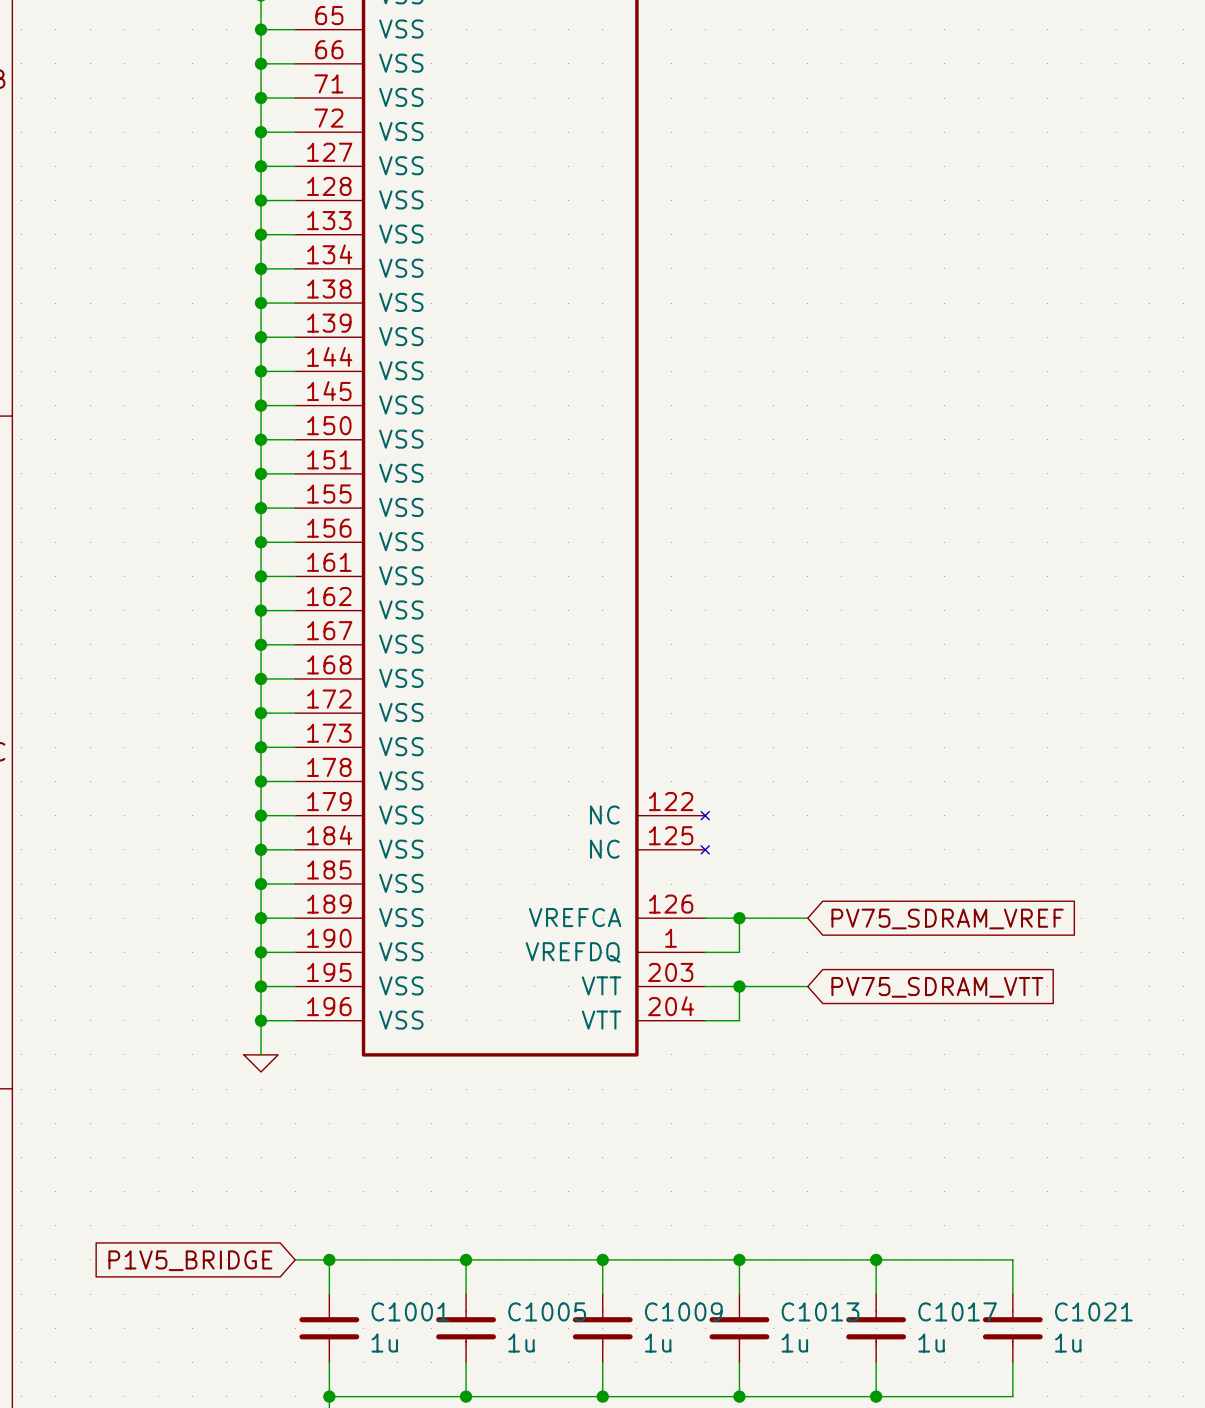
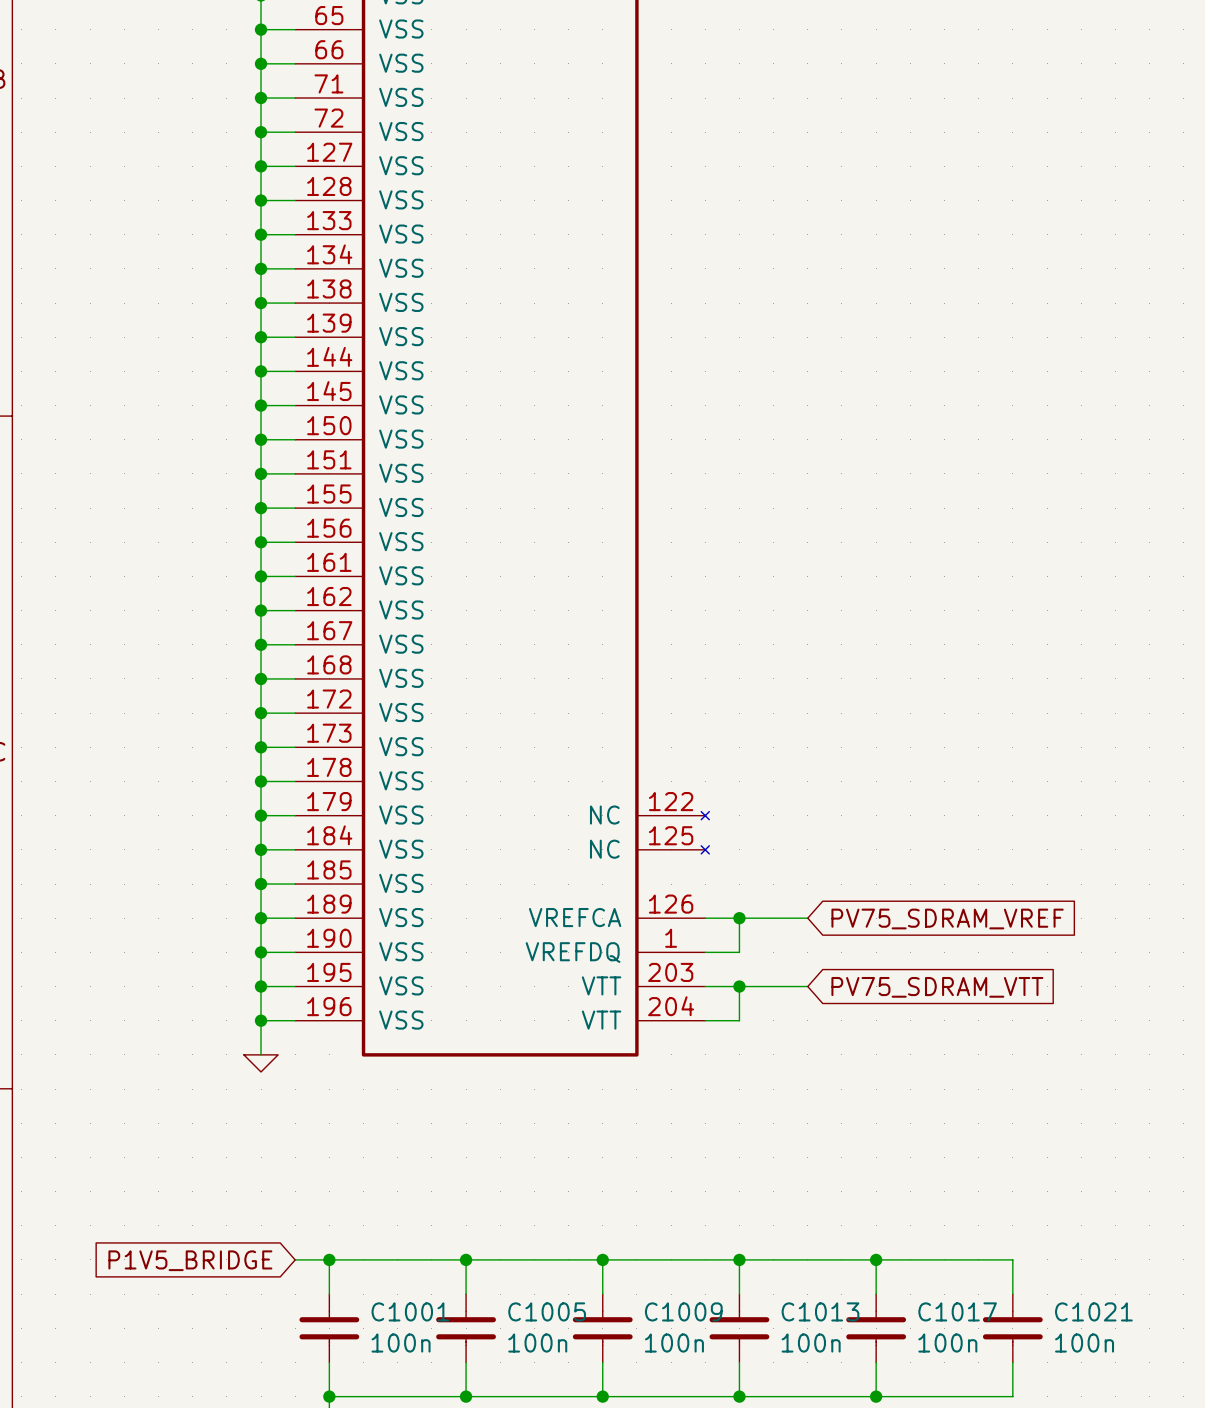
C1001 value: 1u (384, 1343) -> 100n (401, 1343)
C1005 value: 1u (521, 1343) -> 100n (537, 1343)
C1009 value: 1u (658, 1343) -> 100n (674, 1343)
C1013 value: 1u (794, 1343) -> 100n (811, 1343)
C1017 value: 1u (931, 1343) -> 100n (947, 1343)
C1021 value: 1u (1068, 1343) -> 100n (1084, 1343)

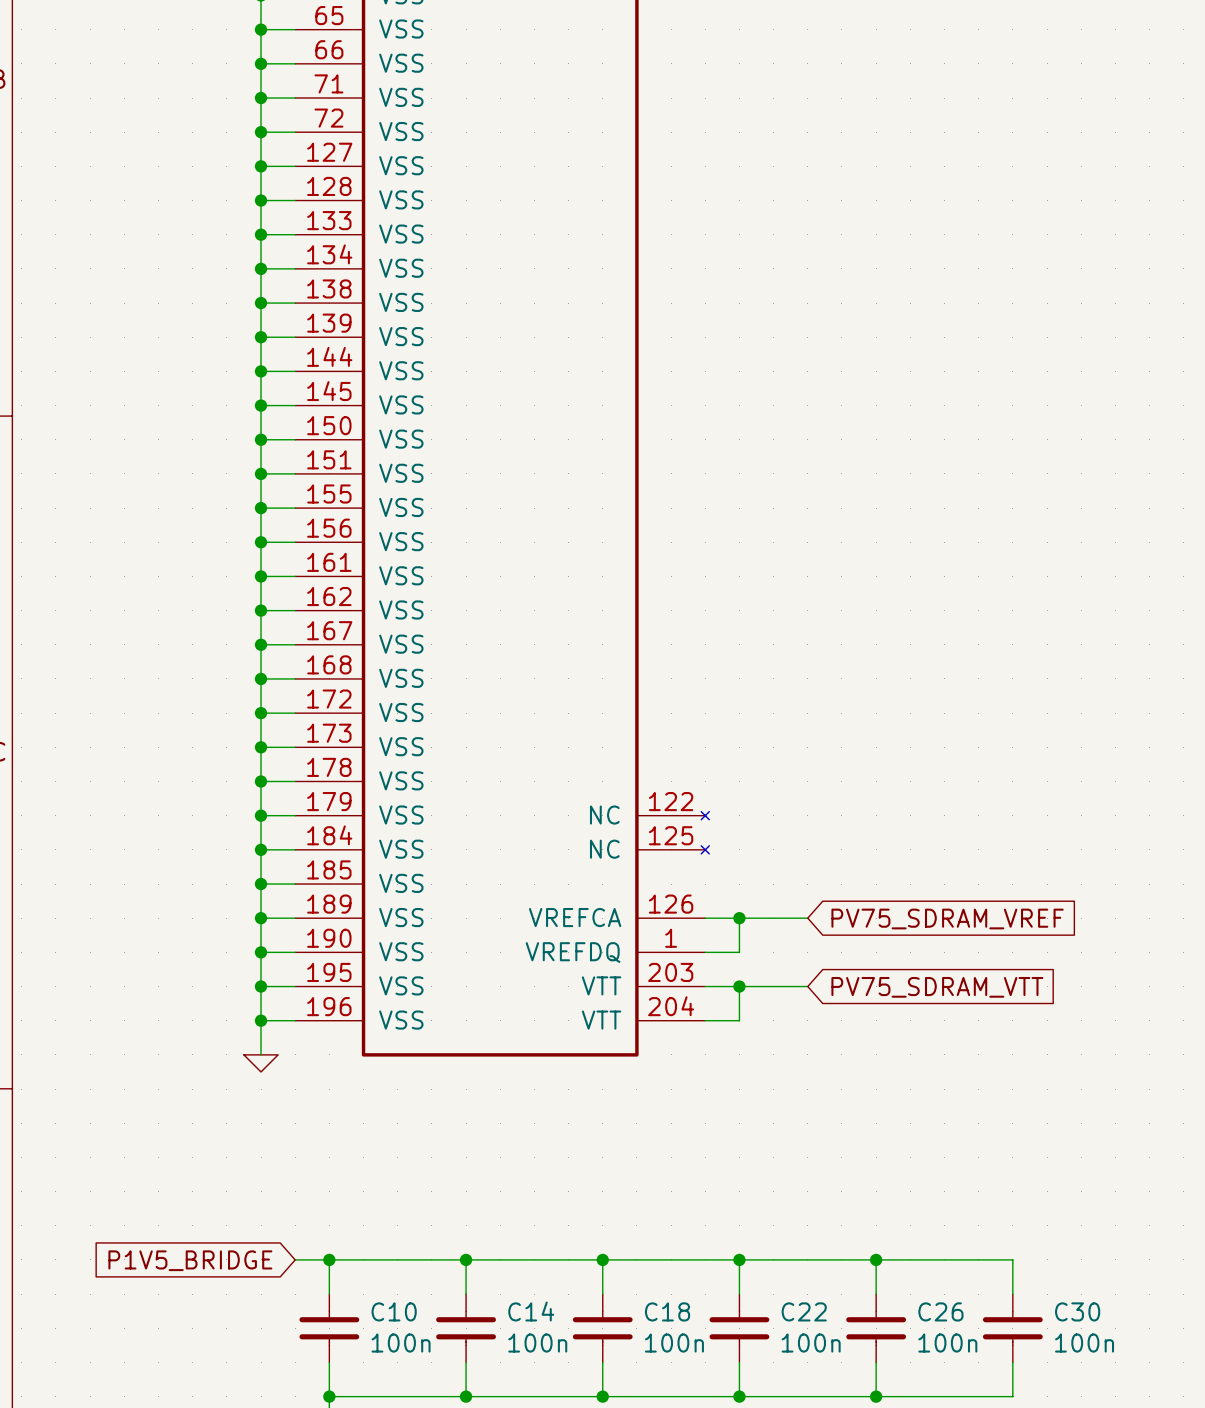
C1001 name: C1001 (410, 1311) -> C10 (394, 1311)
C1005 name: C1005 (547, 1311) -> C14 (531, 1311)
C1009 name: C1009 (683, 1311) -> C18 (667, 1311)
C1013 name: C1013 (820, 1311) -> C22 (804, 1311)
C1017 name: C1017 (957, 1311) -> C26 (940, 1311)
C1021 name: C1021 (1093, 1311) -> C30 (1077, 1311)

